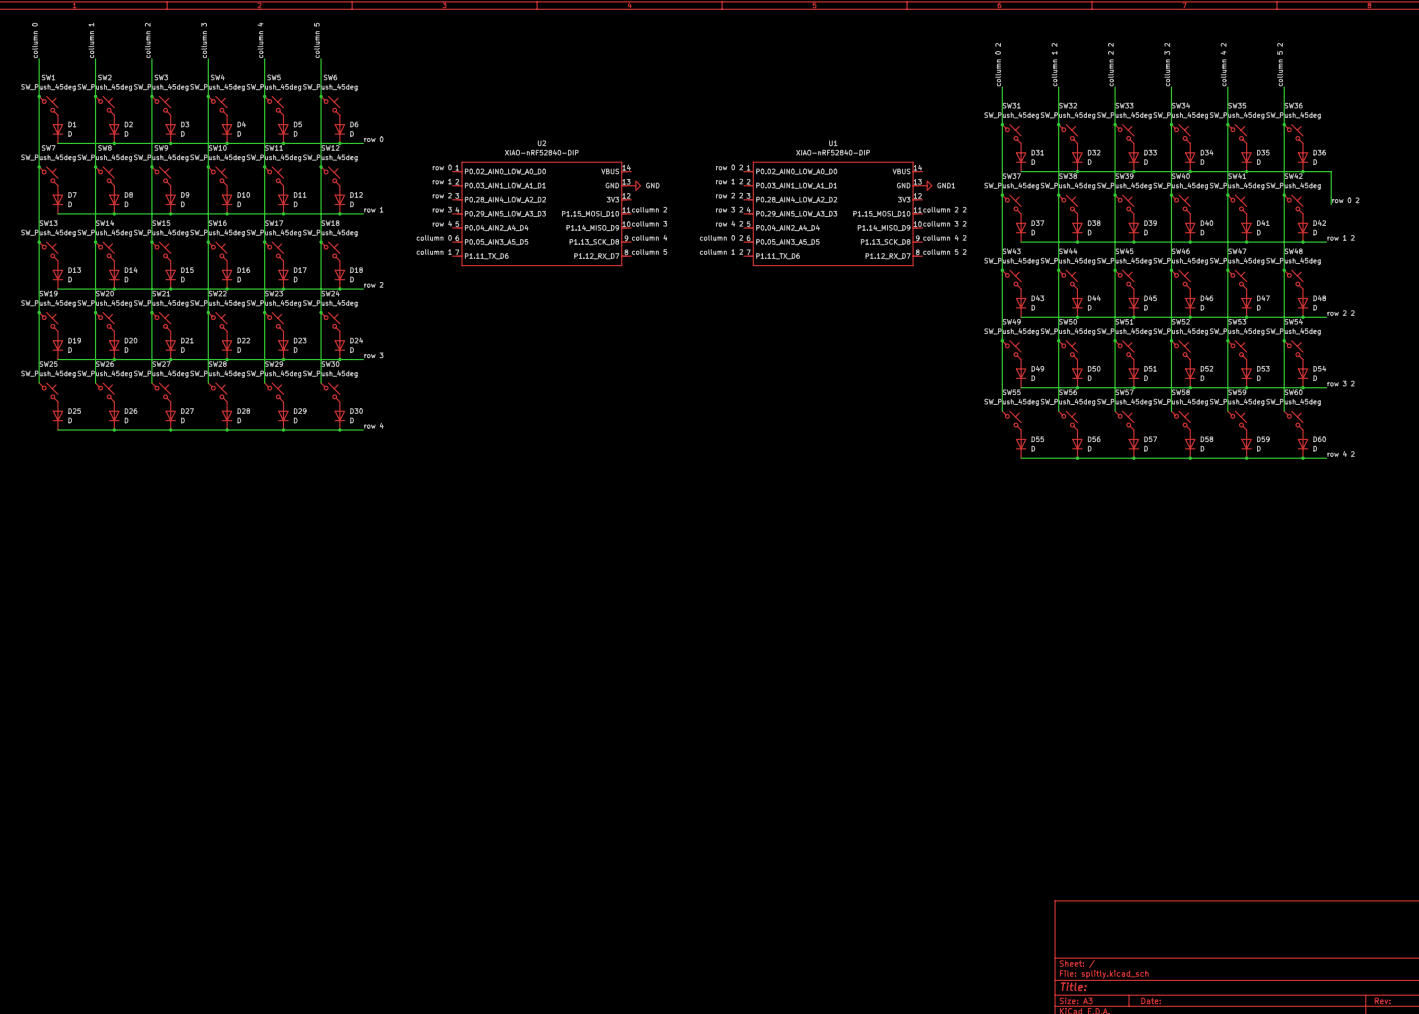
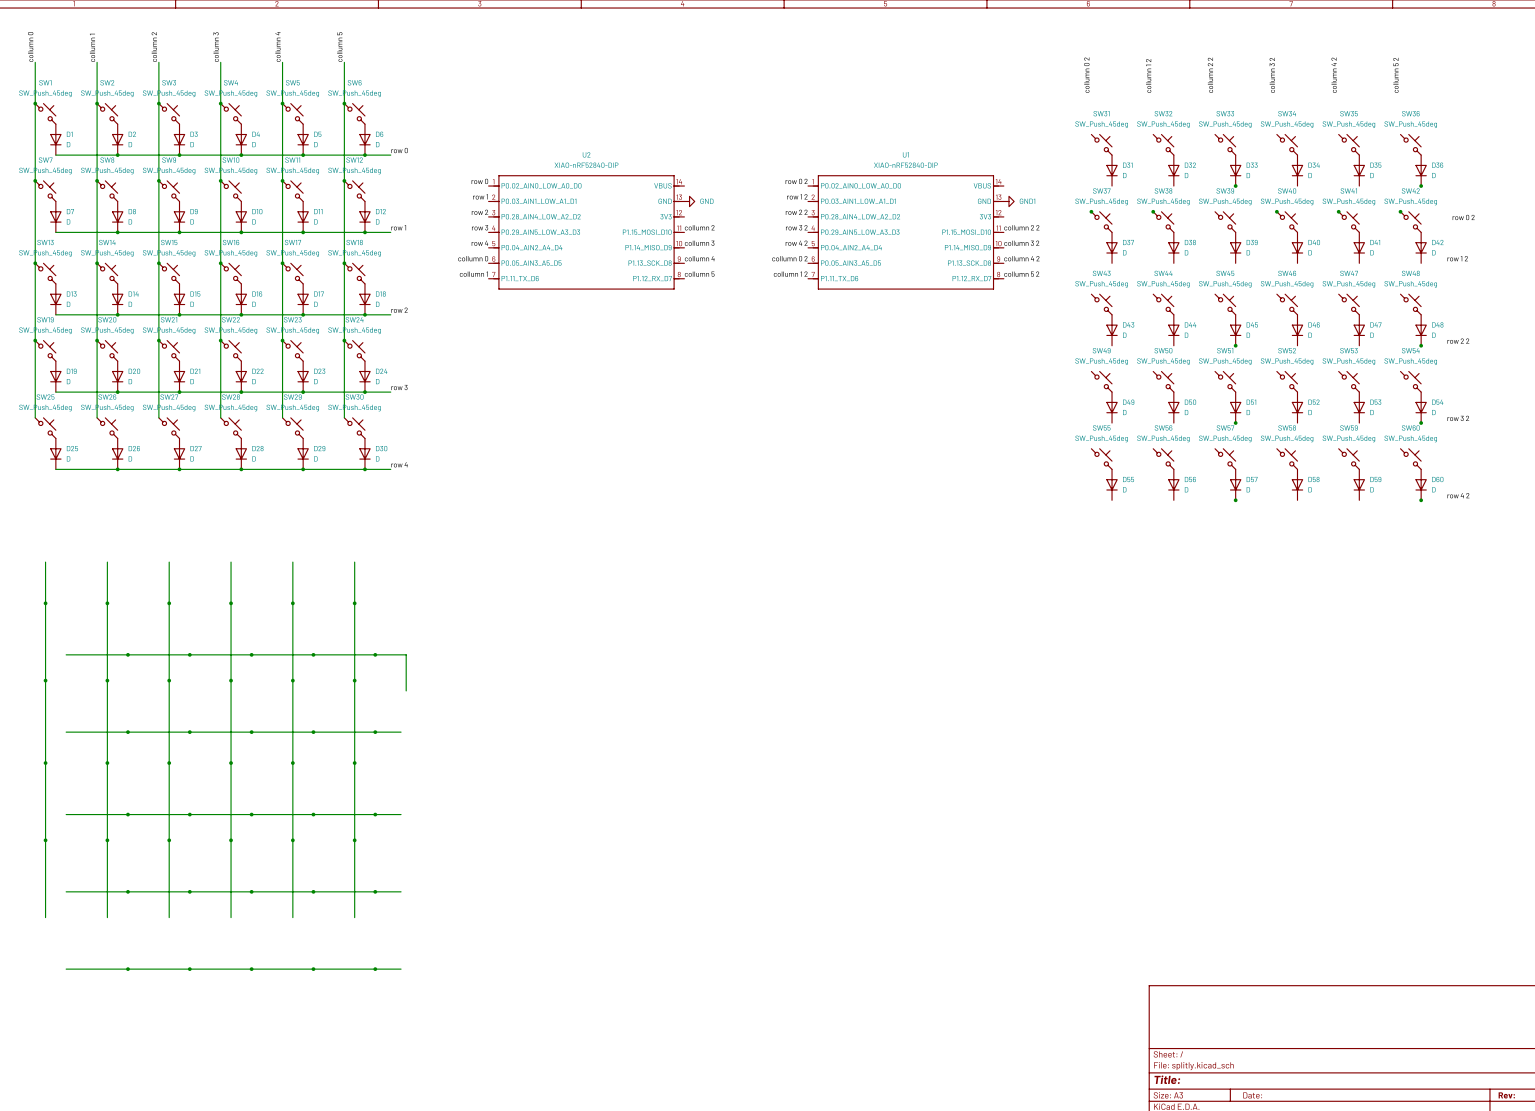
wire: (1002, 87) (1002, 411) -> none
wire: (1058, 87) (1058, 411) -> none
wire: (1115, 87) (1115, 411) -> none
wire: (1171, 87) (1171, 411) -> none
wire: (1227, 87) (1227, 411) -> none
wire: (1284, 87) (1284, 411) -> none
junction: (1002, 124) -> none
junction: (1058, 124) -> none
junction: (1115, 124) -> none
junction: (1171, 124) -> none
junction: (1227, 124) -> none
junction: (1284, 124) -> none
wire: (1021, 171) (1331, 171) (1331, 204) -> none
junction: (1077, 171) -> none
junction: (1190, 171) -> none
junction: (1246, 171) -> none
junction: (1115, 195) -> none
wire: (1021, 242) (1326, 242) -> none
junction: (1077, 242) -> none
junction: (1133, 242) -> none
junction: (1190, 242) -> none
junction: (1246, 242) -> none
junction: (1303, 242) -> none
junction: (1002, 270) -> none
junction: (1058, 270) -> none
junction: (1115, 270) -> none
junction: (1171, 270) -> none
junction: (1227, 270) -> none
junction: (1284, 270) -> none
wire: (1021, 317) (1326, 317) -> none
junction: (1077, 317) -> none
junction: (1190, 317) -> none
junction: (1246, 317) -> none
junction: (1002, 340) -> none
junction: (1058, 340) -> none
junction: (1115, 340) -> none
junction: (1171, 340) -> none
junction: (1227, 340) -> none
junction: (1284, 340) -> none
wire: (1021, 387) (1326, 387) -> none
junction: (1077, 387) -> none
junction: (1190, 387) -> none
junction: (1246, 387) -> none
wire: (1021, 458) (1326, 458) -> none
junction: (1077, 458) -> none
junction: (1190, 458) -> none
junction: (1246, 458) -> none
wire: none -> (45, 562) (45, 917)
wire: none -> (107, 562) (107, 917)
wire: none -> (169, 562) (169, 917)
wire: none -> (231, 562) (231, 917)
wire: none -> (292, 562) (292, 917)
wire: none -> (354, 562) (354, 917)
junction: none -> (45, 603)
junction: none -> (107, 603)
junction: none -> (169, 603)
junction: none -> (231, 603)
junction: none -> (292, 603)
junction: none -> (354, 603)
wire: none -> (66, 654) (406, 654) (406, 690)
junction: none -> (127, 654)
junction: none -> (189, 654)
junction: none -> (251, 654)
junction: none -> (313, 654)
junction: none -> (375, 654)
junction: none -> (45, 680)
junction: none -> (107, 680)
junction: none -> (169, 680)
junction: none -> (231, 680)
junction: none -> (292, 680)
junction: none -> (354, 680)
wire: none -> (66, 732) (401, 732)
junction: none -> (127, 732)
junction: none -> (189, 732)
junction: none -> (251, 732)
junction: none -> (313, 732)
junction: none -> (375, 732)
junction: none -> (45, 763)
junction: none -> (107, 763)
junction: none -> (169, 763)
junction: none -> (231, 763)
junction: none -> (292, 763)
junction: none -> (354, 763)
wire: none -> (66, 814) (401, 814)
junction: none -> (127, 814)
junction: none -> (189, 814)
junction: none -> (251, 814)
junction: none -> (313, 814)
junction: none -> (375, 814)
junction: none -> (45, 840)
junction: none -> (107, 840)
junction: none -> (169, 840)
junction: none -> (231, 840)
junction: none -> (292, 840)
junction: none -> (354, 840)
wire: none -> (66, 891) (401, 891)
junction: none -> (127, 891)
junction: none -> (189, 891)
junction: none -> (251, 891)
junction: none -> (313, 891)
junction: none -> (375, 891)
wire: none -> (66, 969) (401, 969)
junction: none -> (127, 969)
junction: none -> (189, 969)
junction: none -> (251, 969)
junction: none -> (313, 969)
junction: none -> (375, 969)

